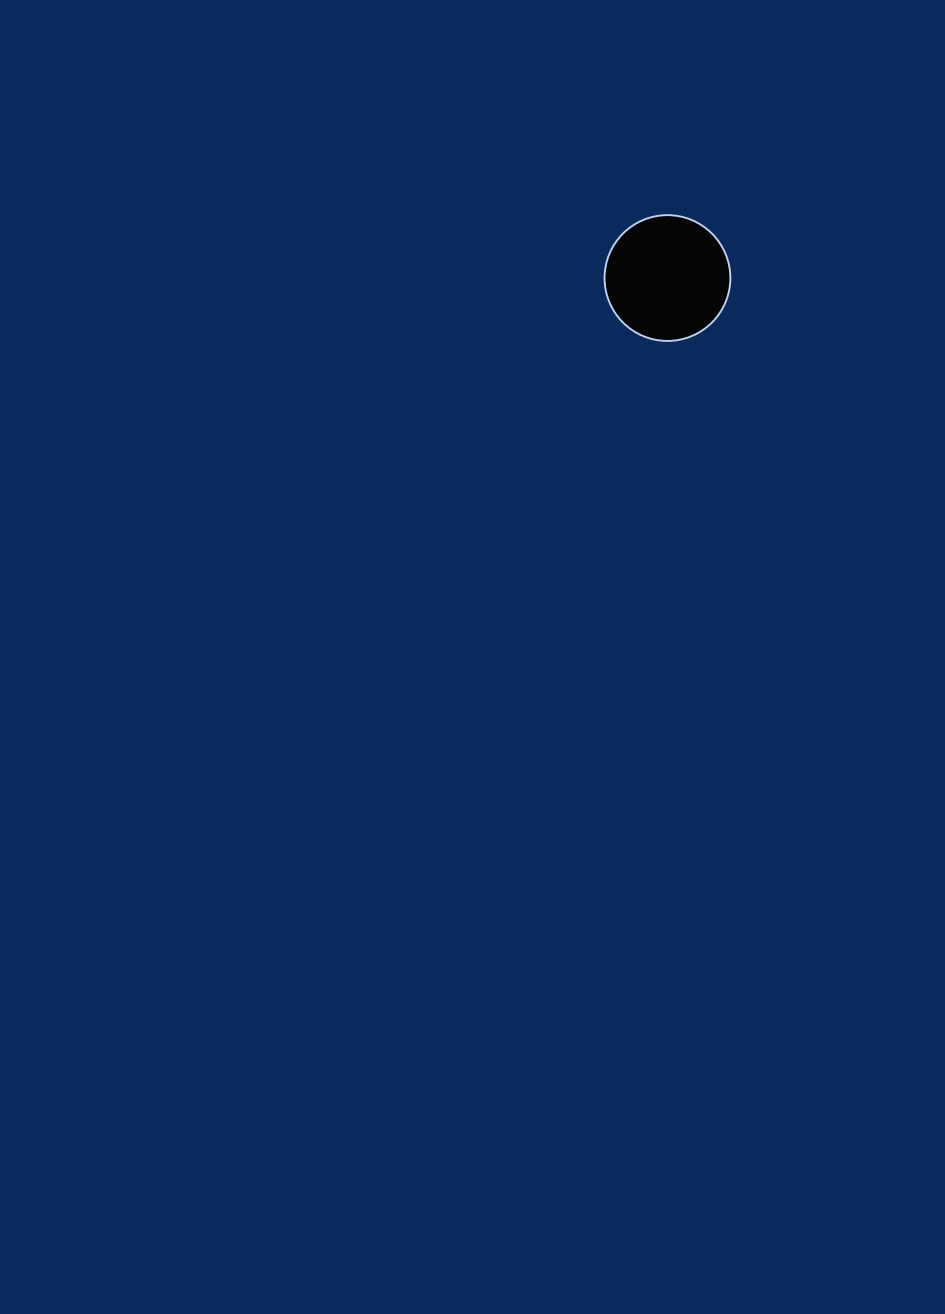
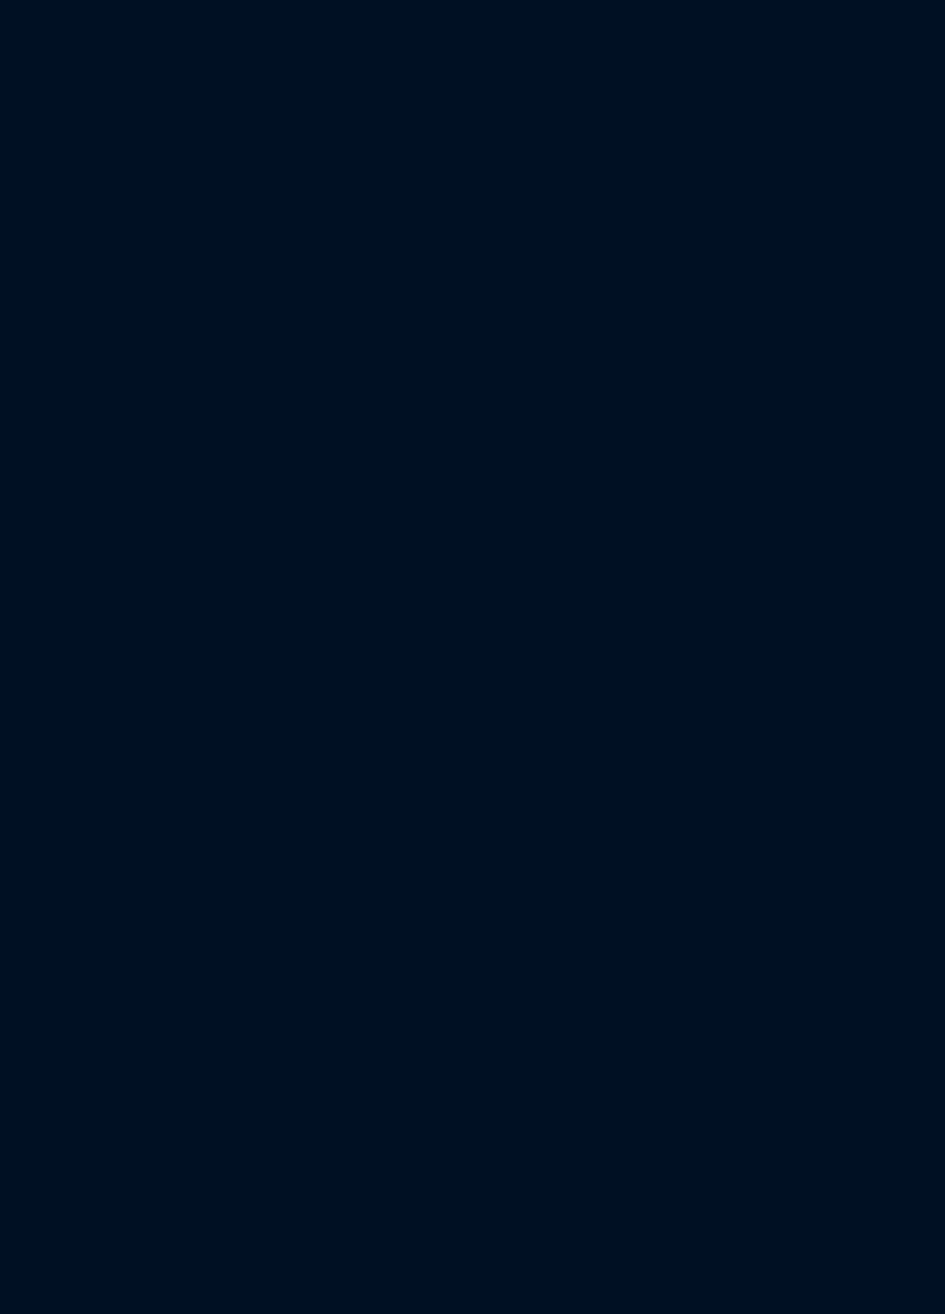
part: (667, 278) -> none

